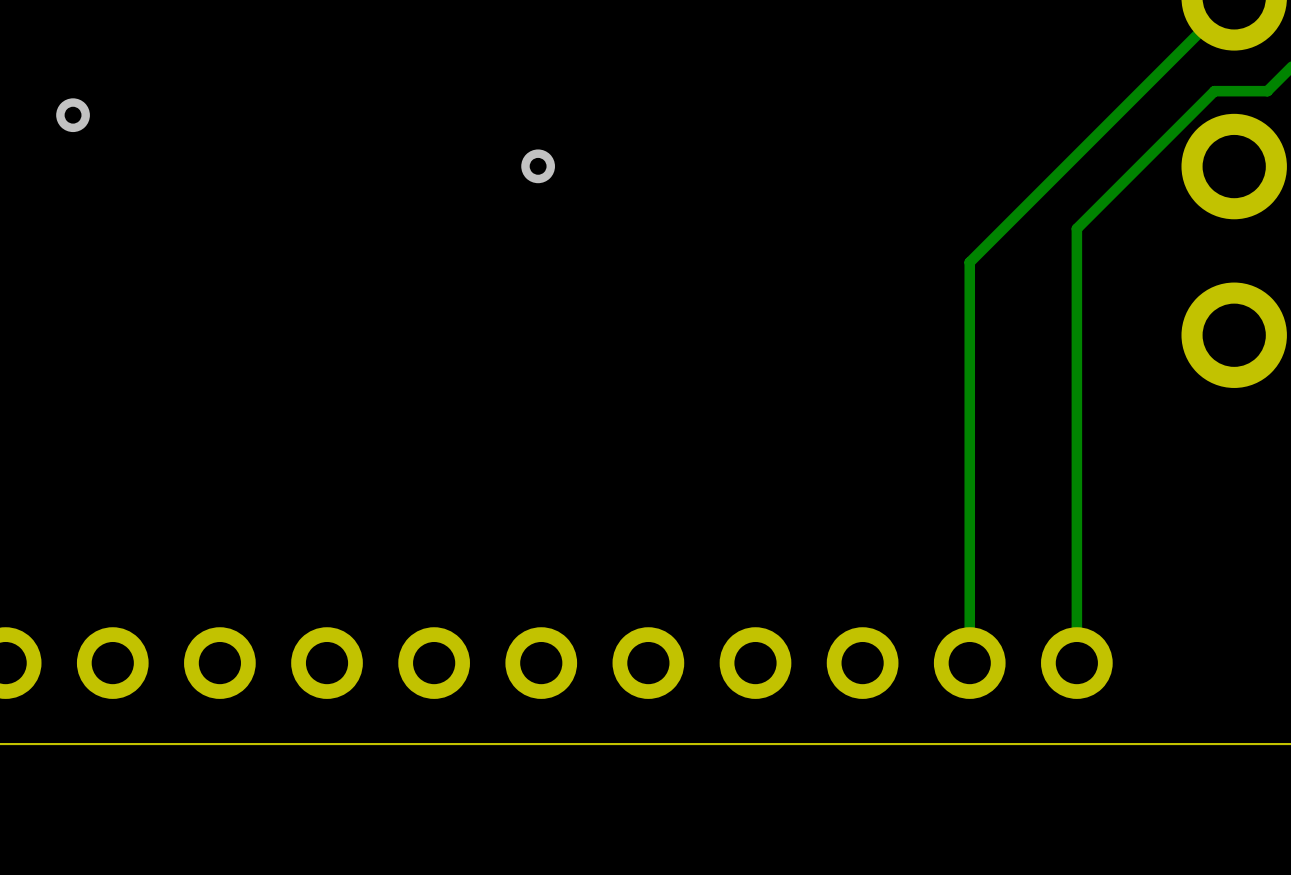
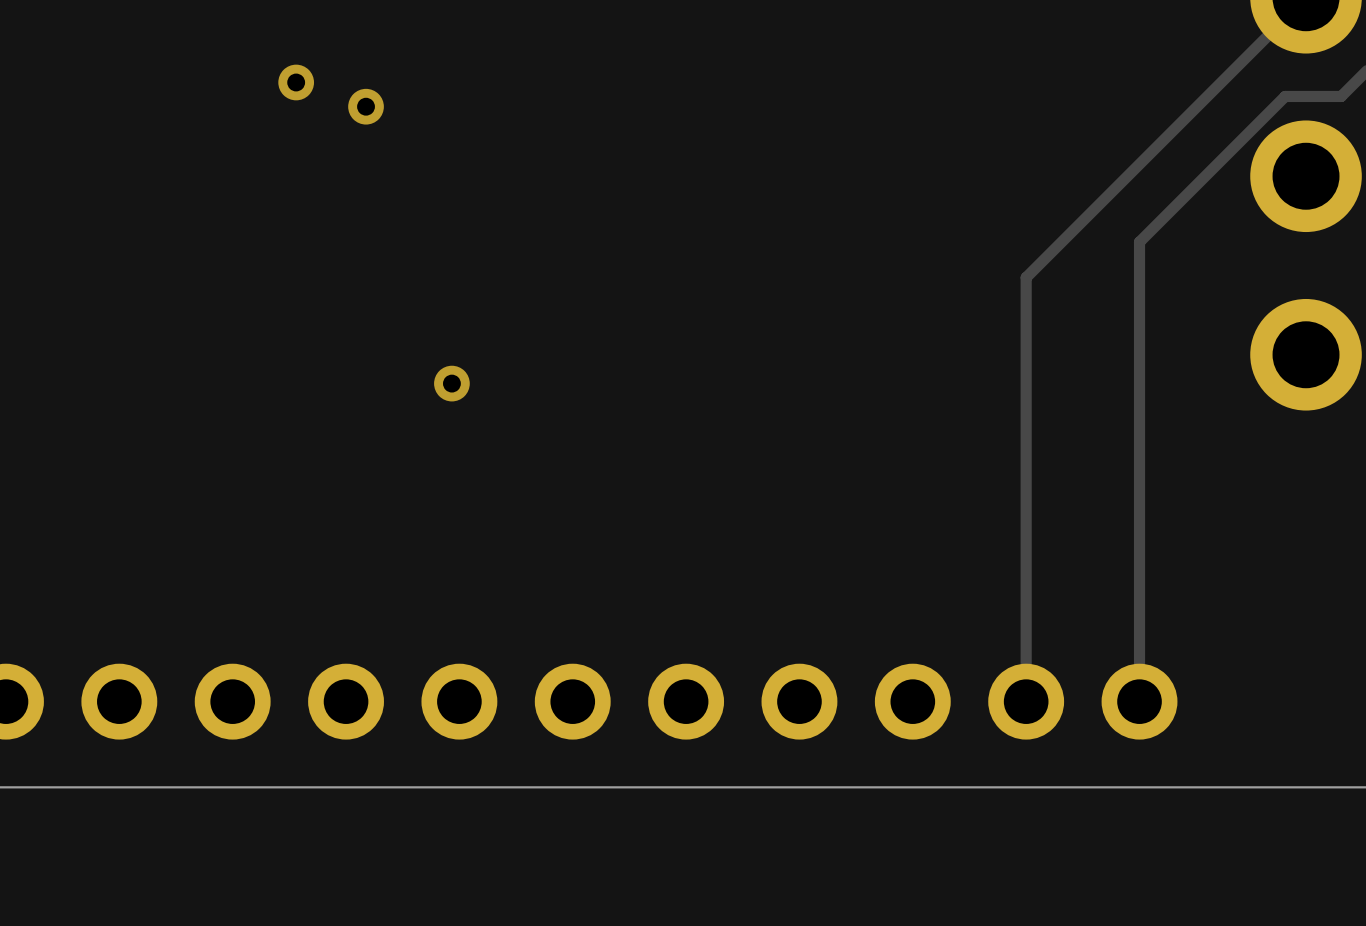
via: none -> (296, 82)
via: none -> (366, 106)
via: (73, 115) -> none
via: (538, 166) -> none
via: none -> (451, 383)

